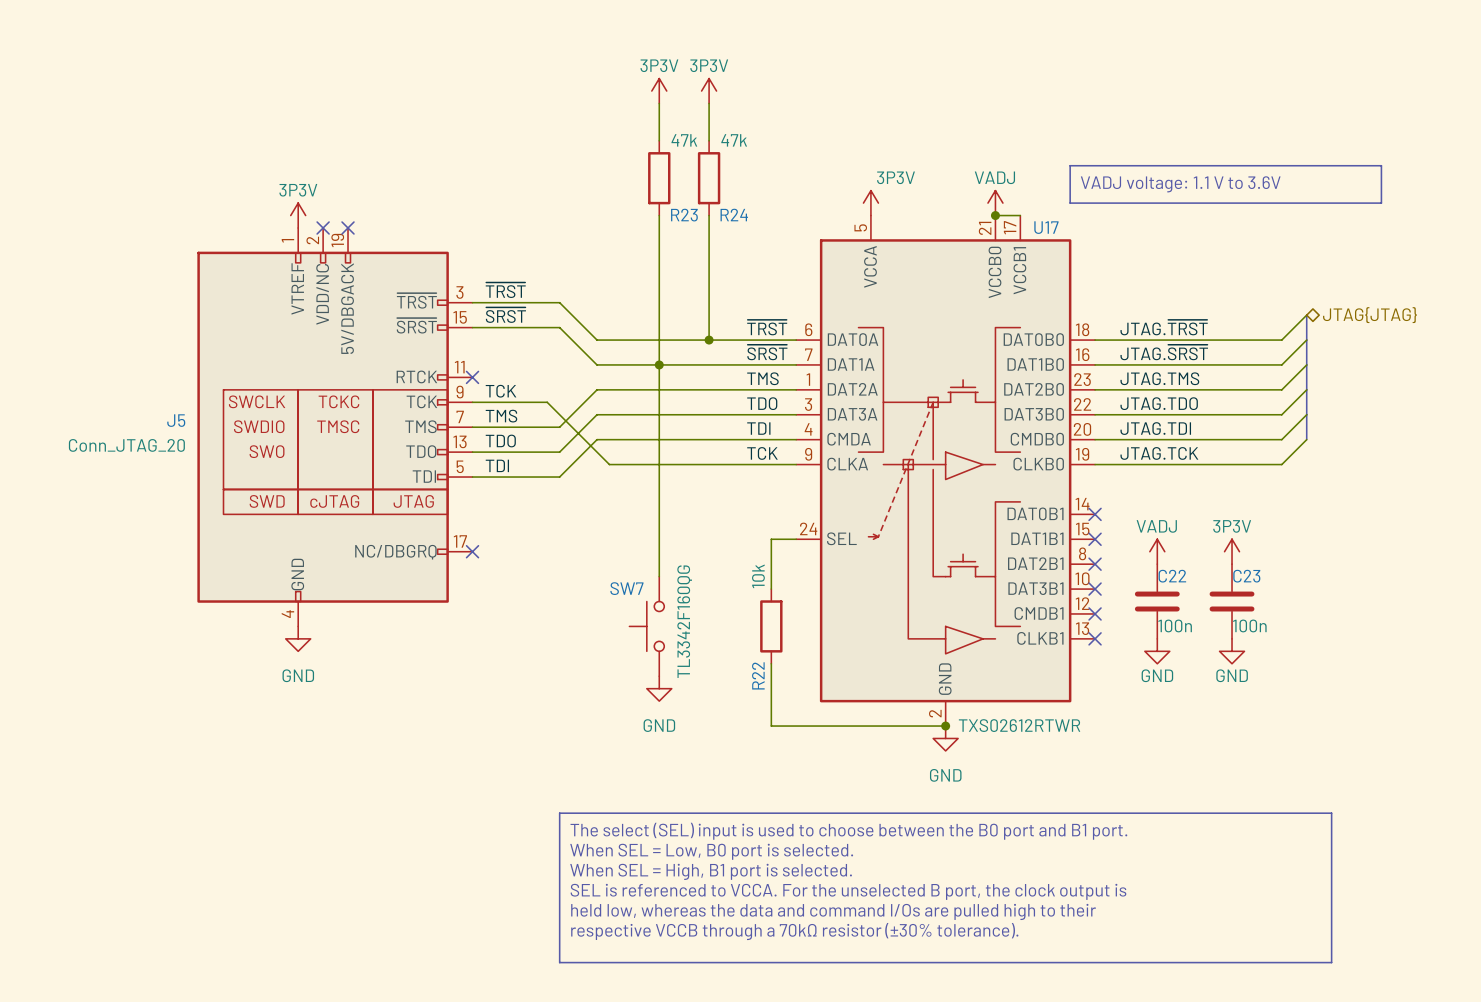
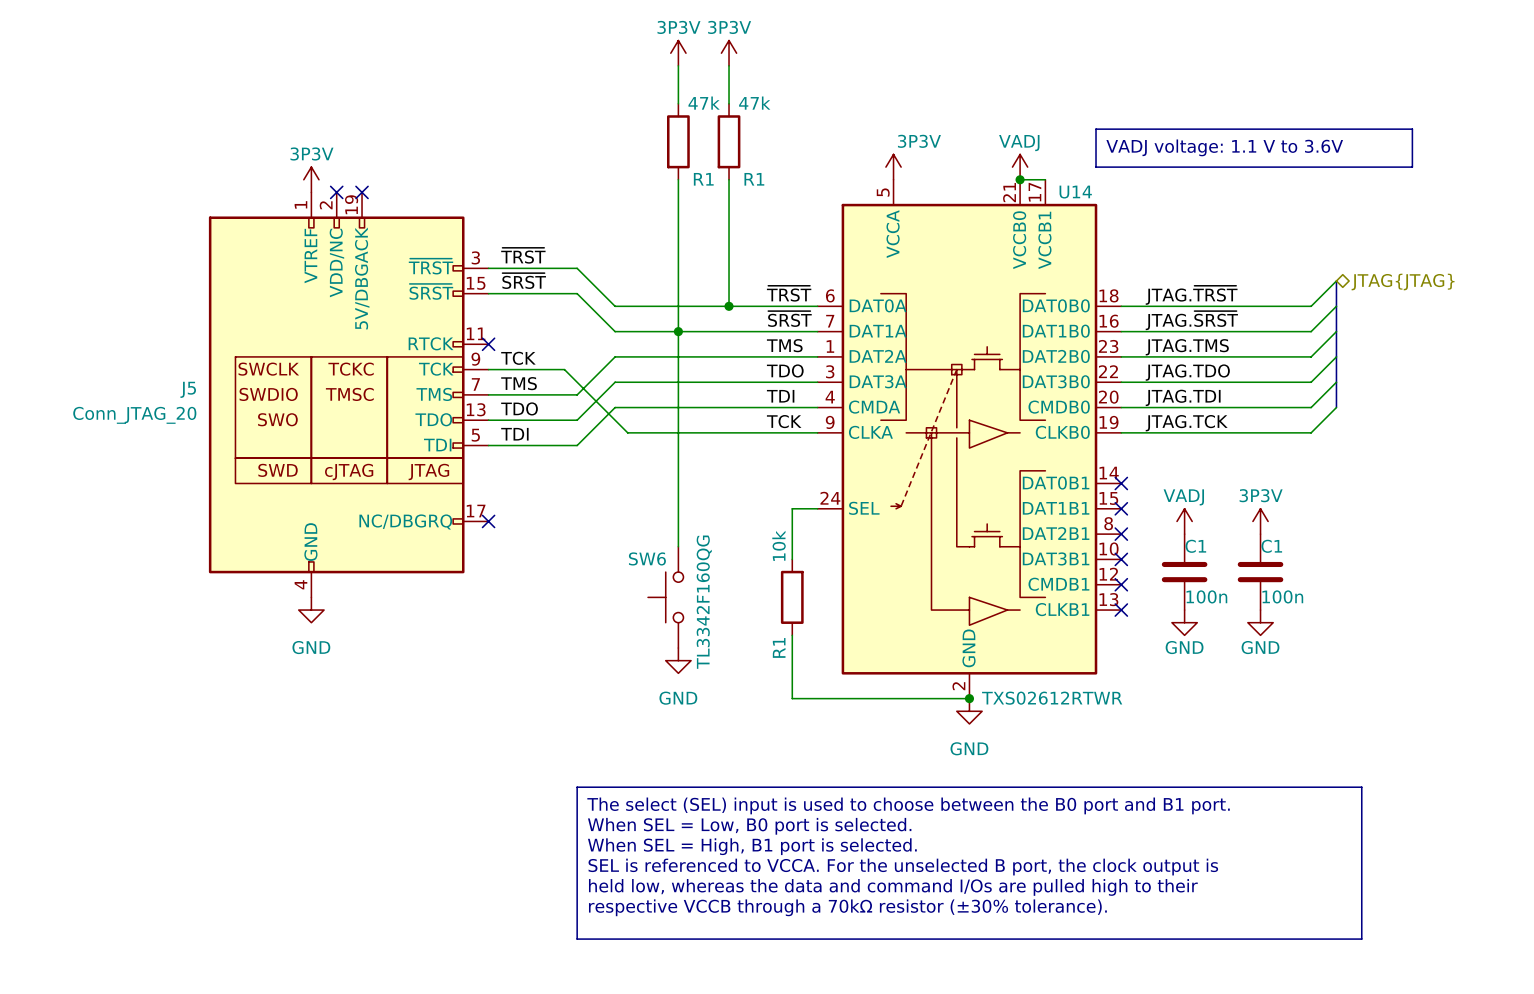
R23 name: R23 (684, 215) -> R1 (703, 179)
R24 name: R24 (734, 215) -> R1 (754, 179)
U17 name: U17 (1046, 227) -> U14 (1075, 192)
C22 name: C22 (1172, 576) -> C1 (1195, 546)
C23 name: C23 (1246, 576) -> C1 (1271, 546)
SW7 name: SW7 (626, 588) -> SW6 (647, 558)
R22 name: R22 (758, 675) -> R1 (779, 647)

